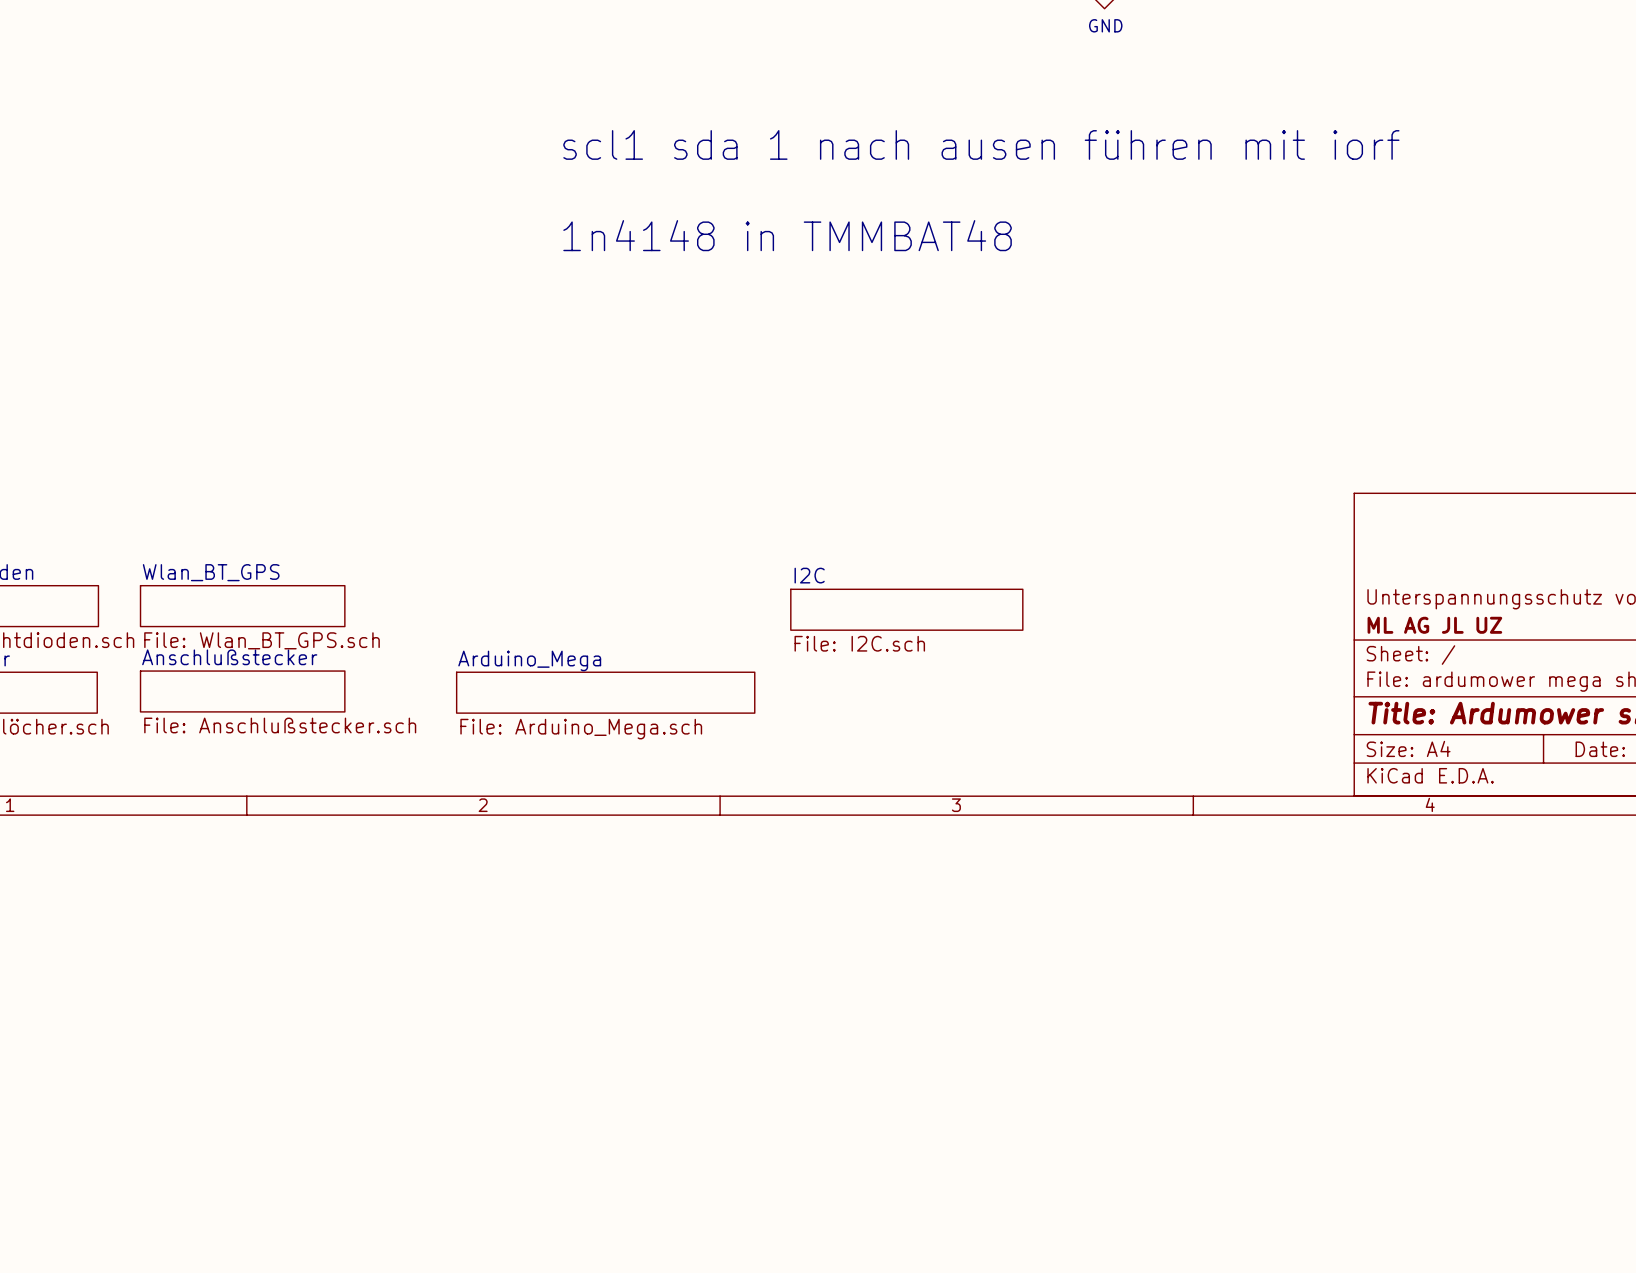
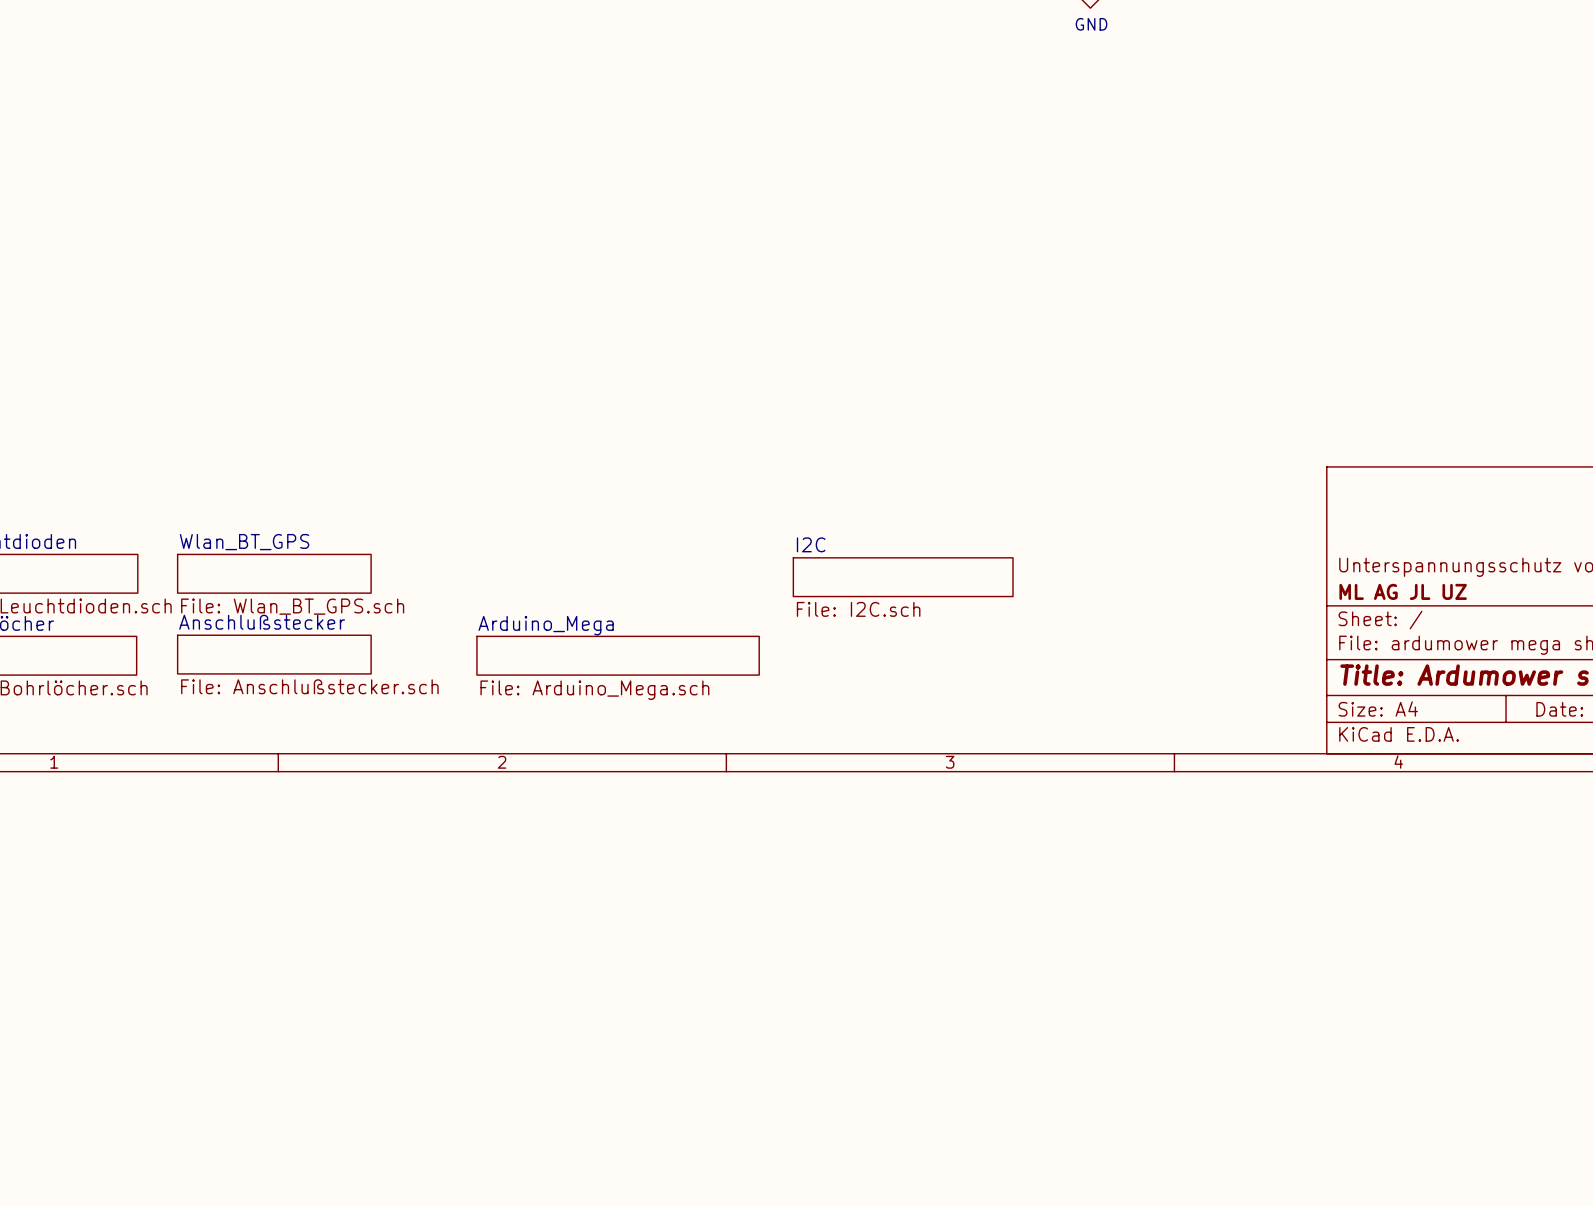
text: scl1 sda 1 nach ausen führen mit iorf (981, 144) -> none
text: 1n4148 in TMMBAT48 (787, 235) -> none

